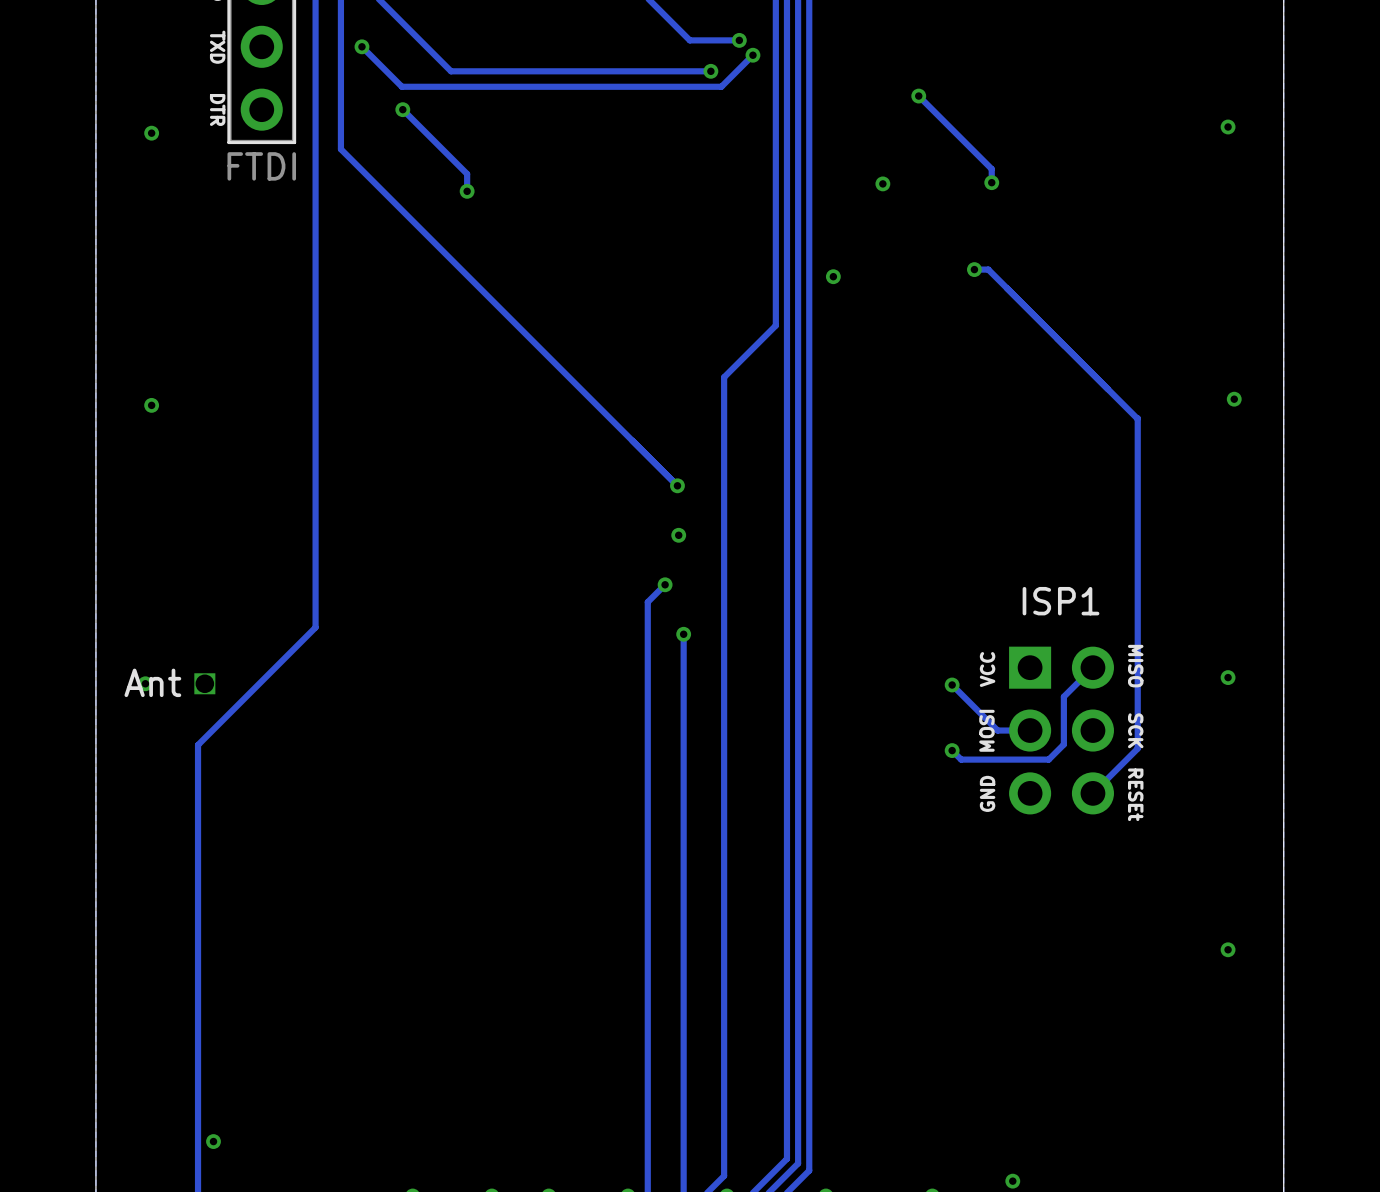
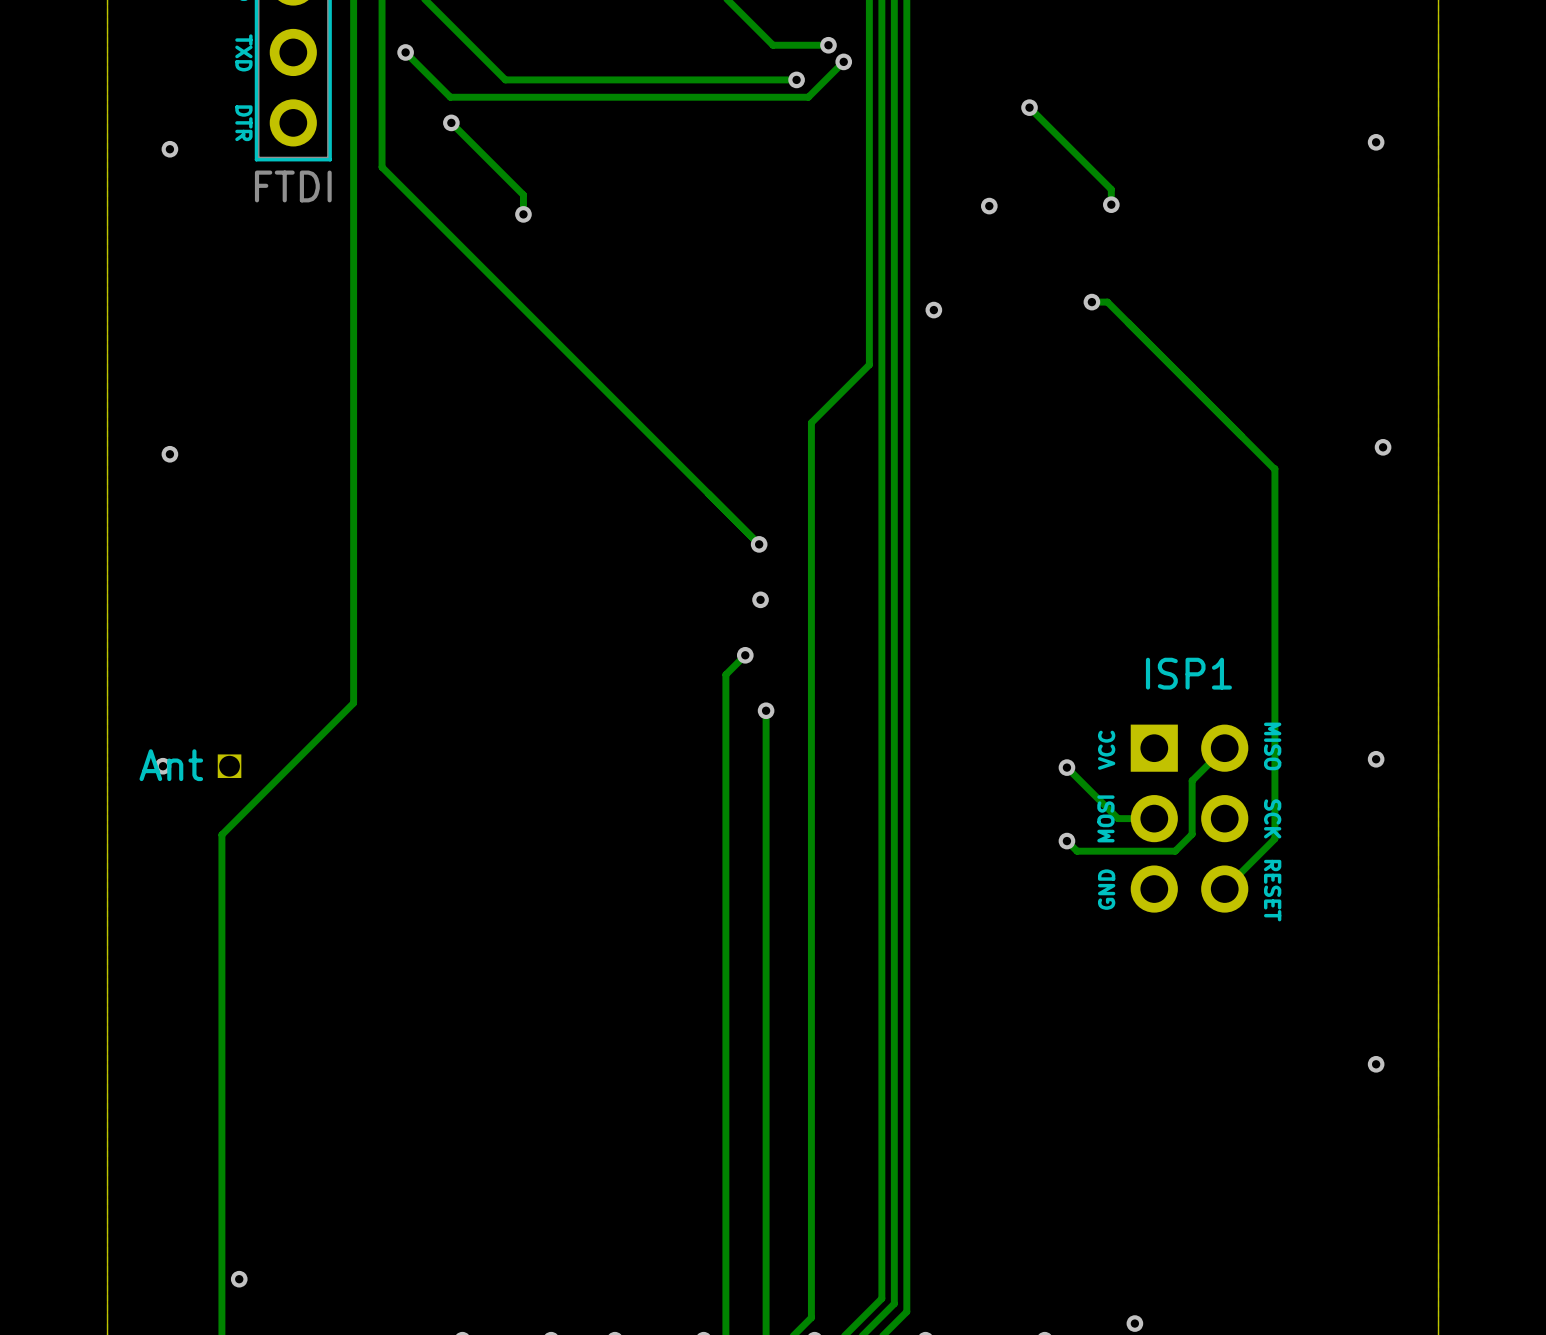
text: RESEt (1135, 794) -> RESET (1272, 890)

